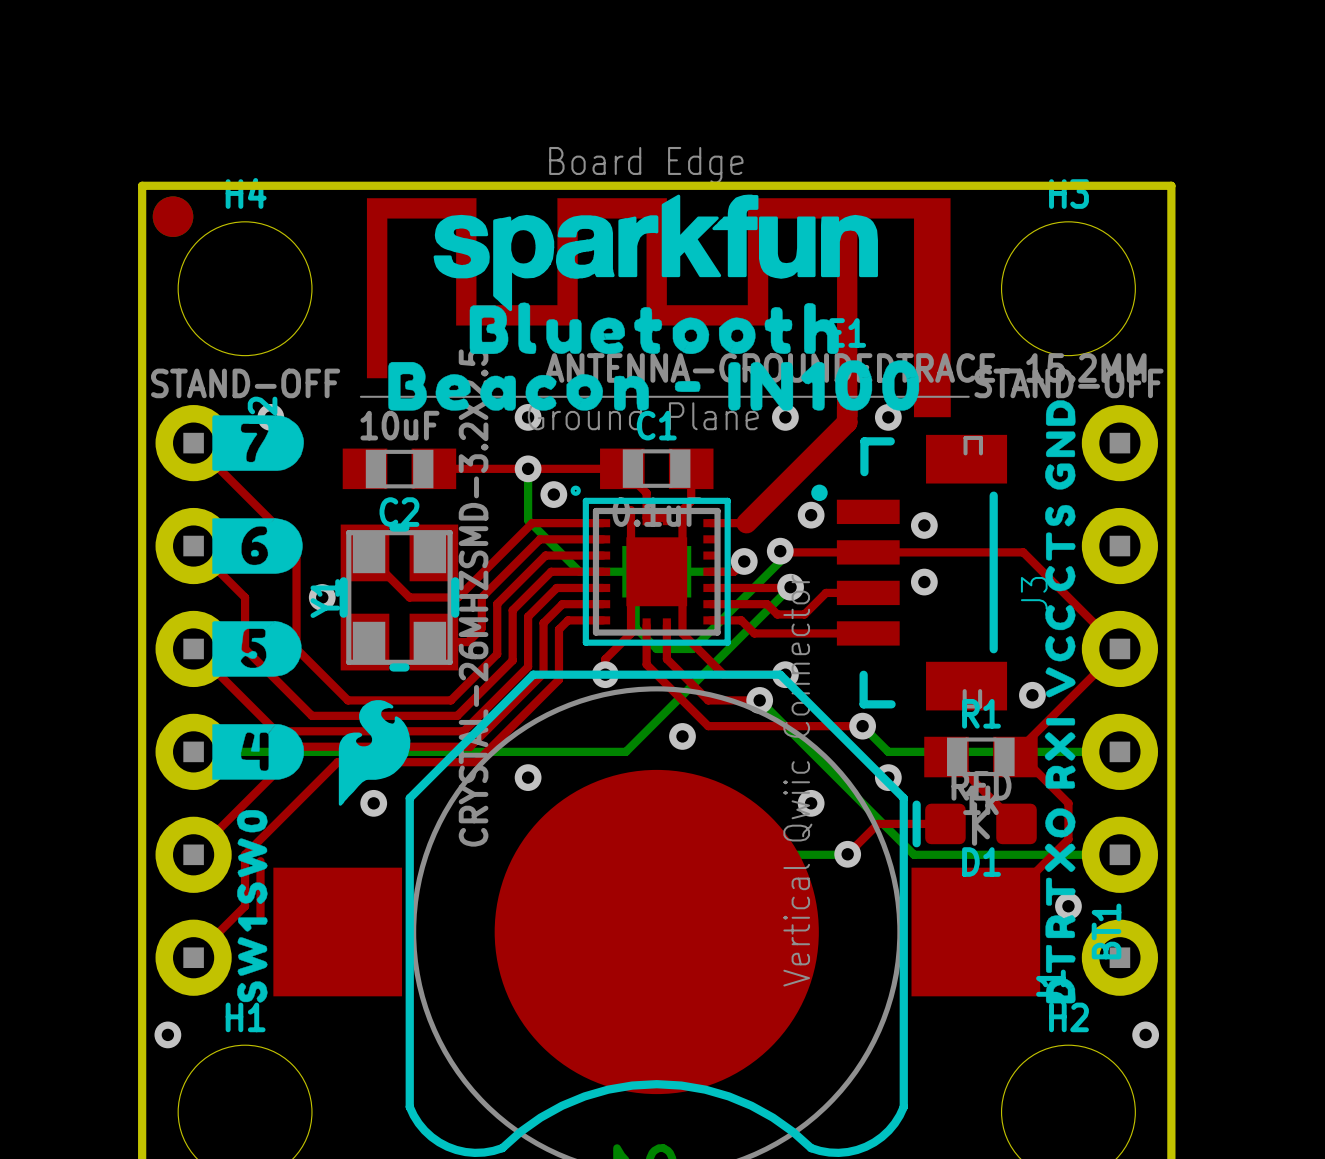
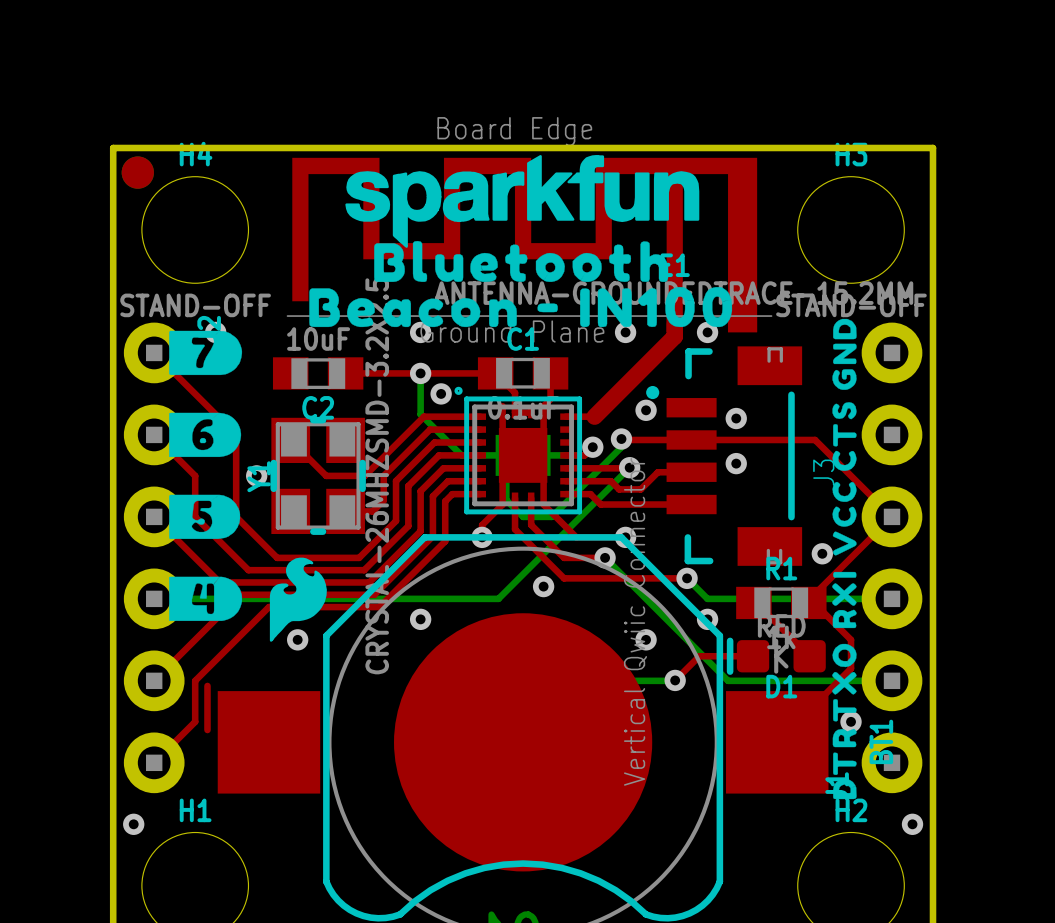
drawing: [236, 810, 268, 1003] -> none

